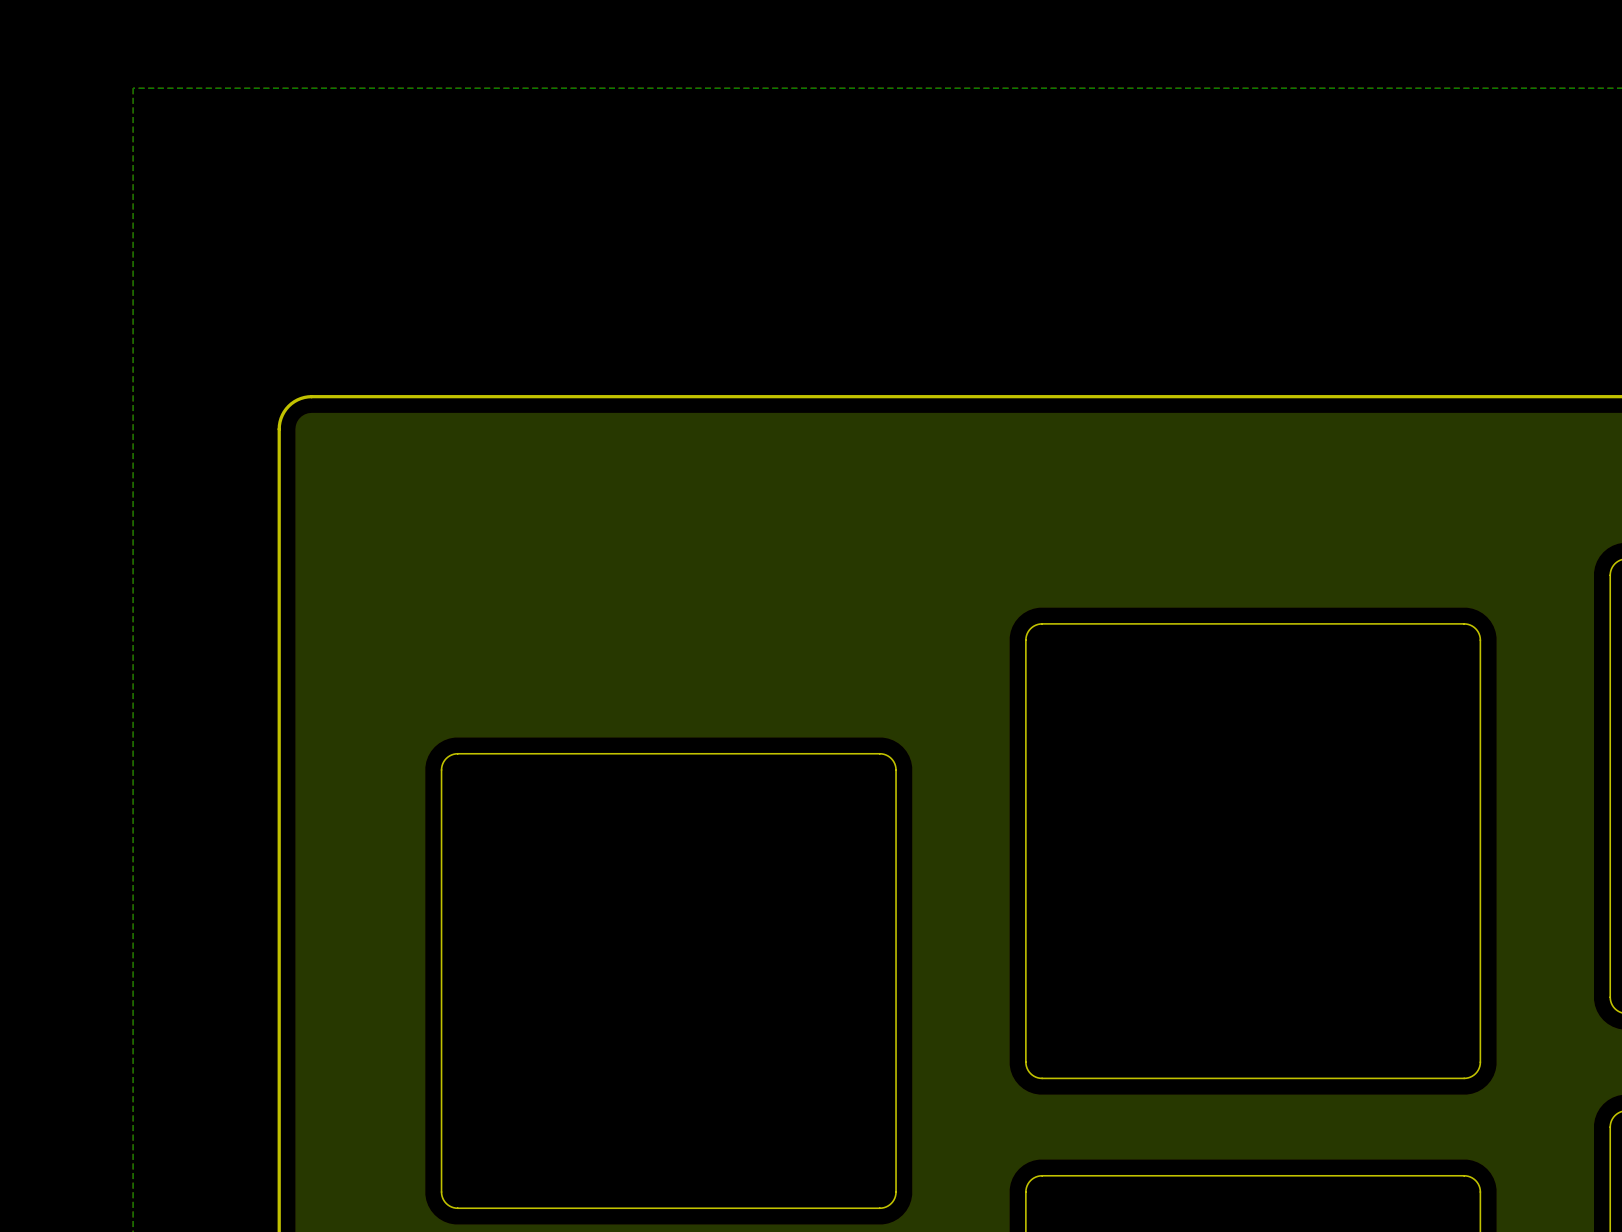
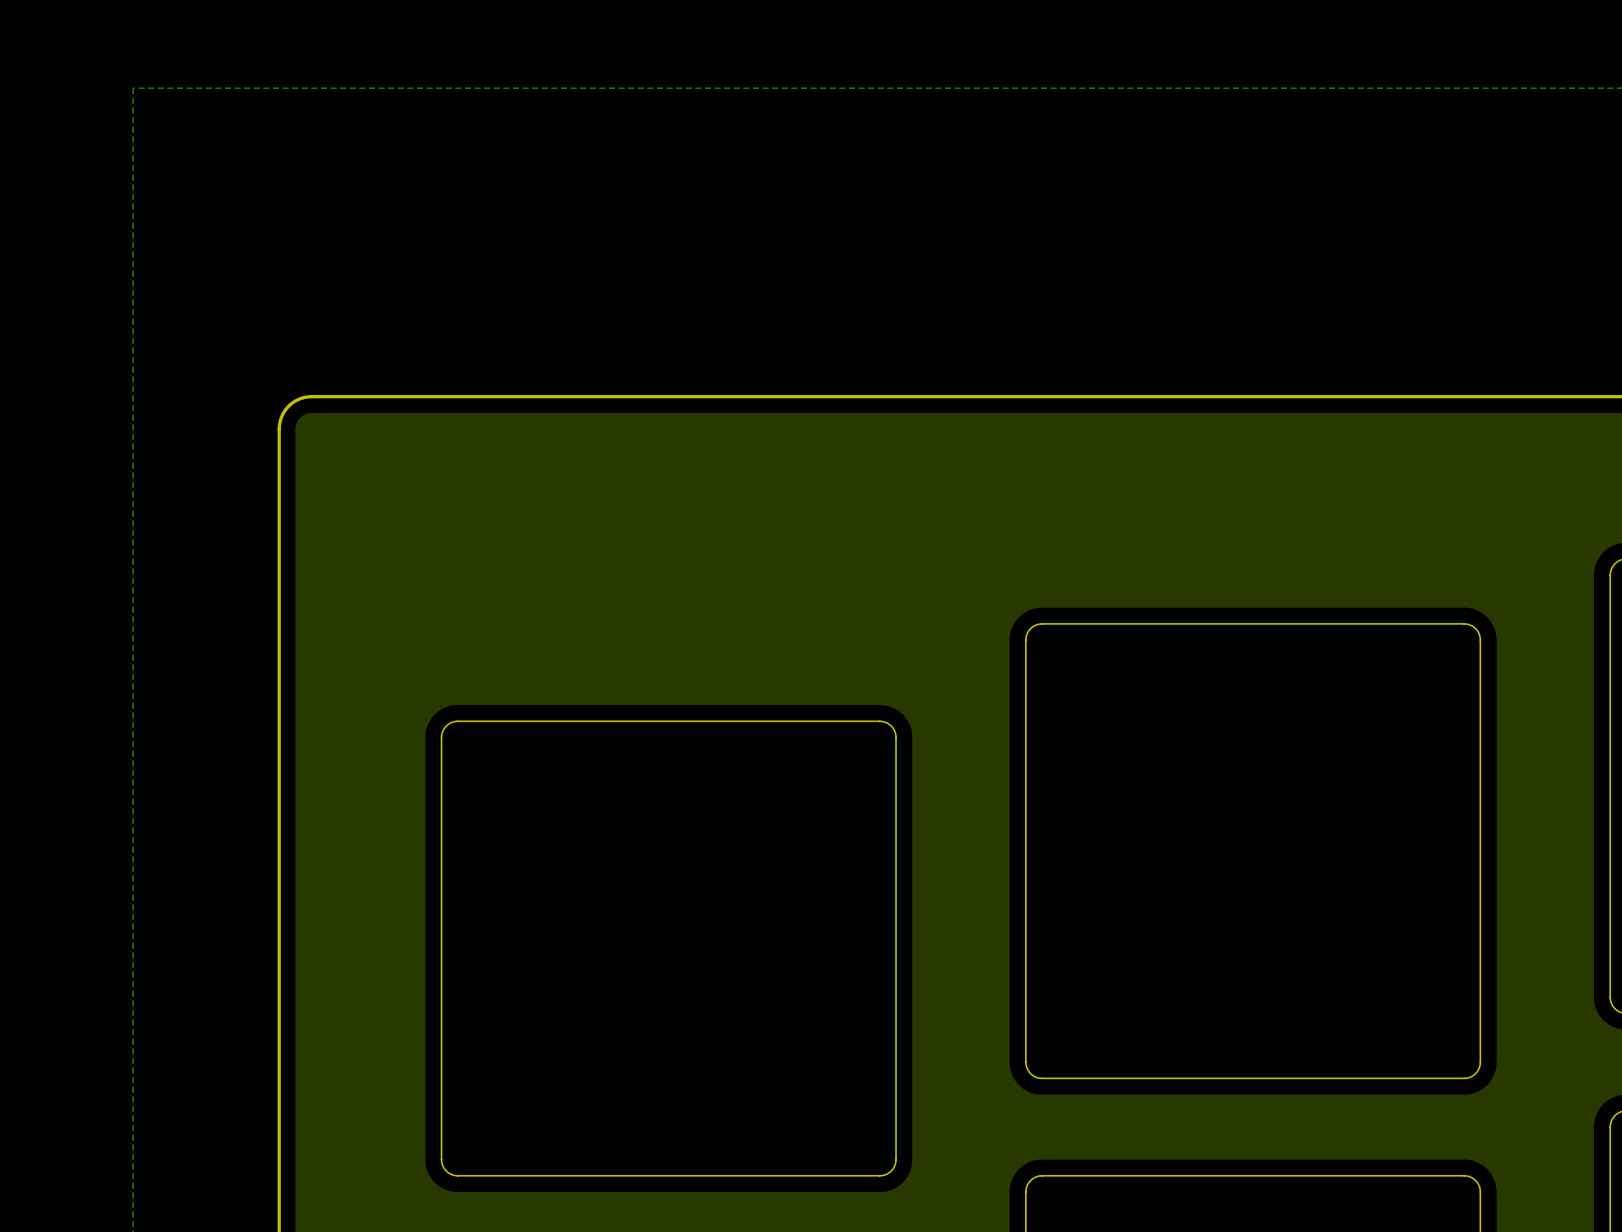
drawing position: (668, 981) -> (668, 948)

